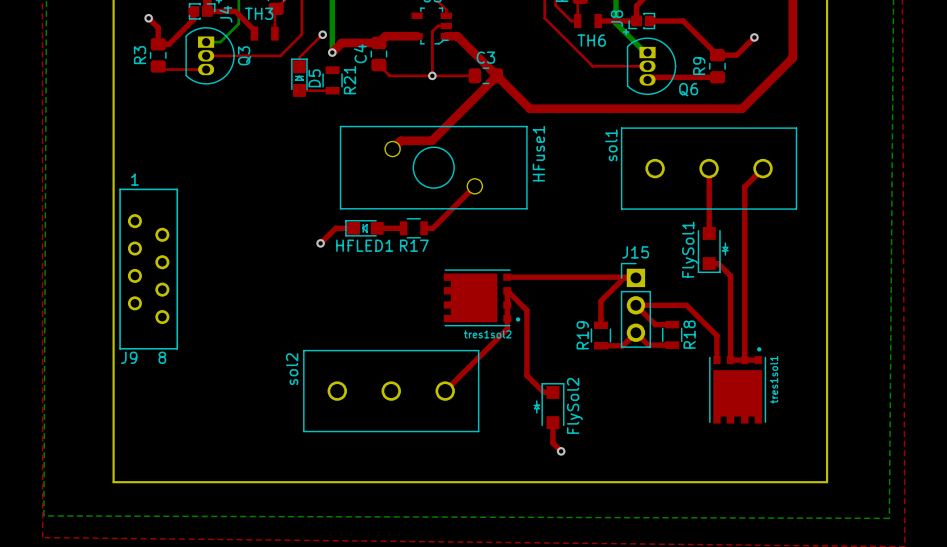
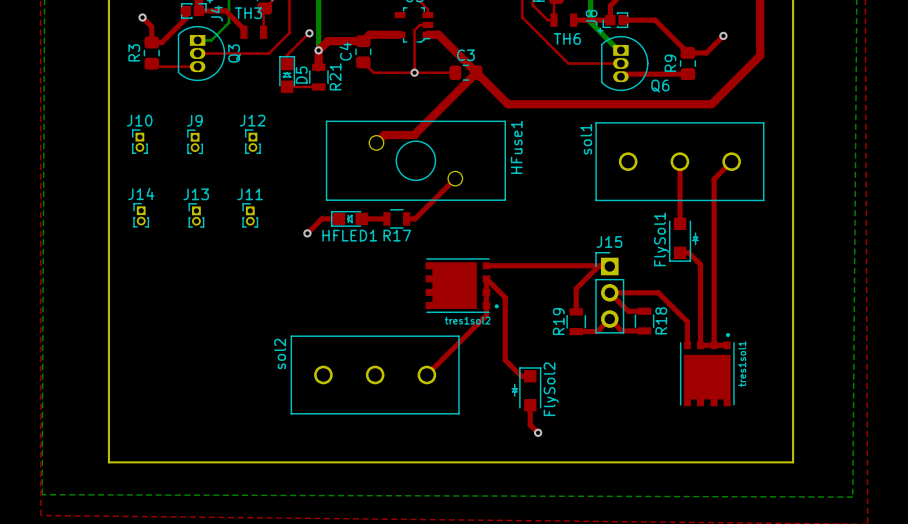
top track: none -> (318, 50) (318, 67)
J10: none -> (139, 141)
J12: none -> (252, 141)
J9 footprint: [119, 188, 179, 350] -> [187, 129, 203, 155]
J14: none -> (141, 215)
J13: none -> (196, 215)
J11: none -> (250, 215)
J9 name position: J9 (129, 357) -> J9 (194, 120)

